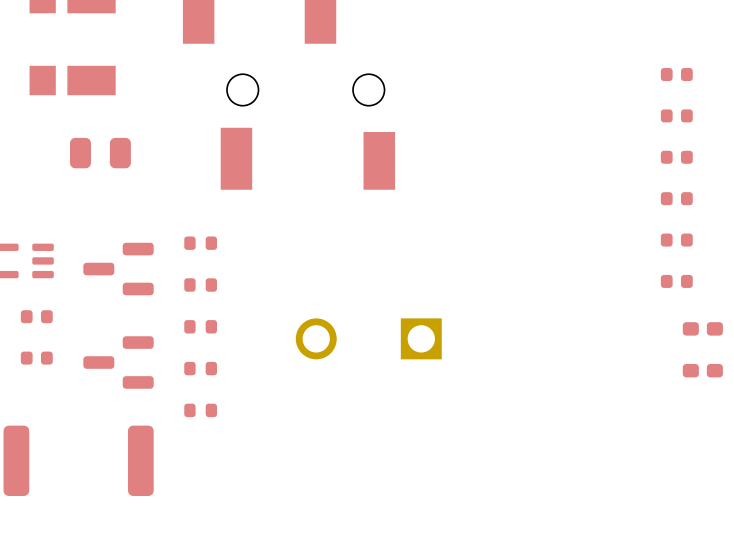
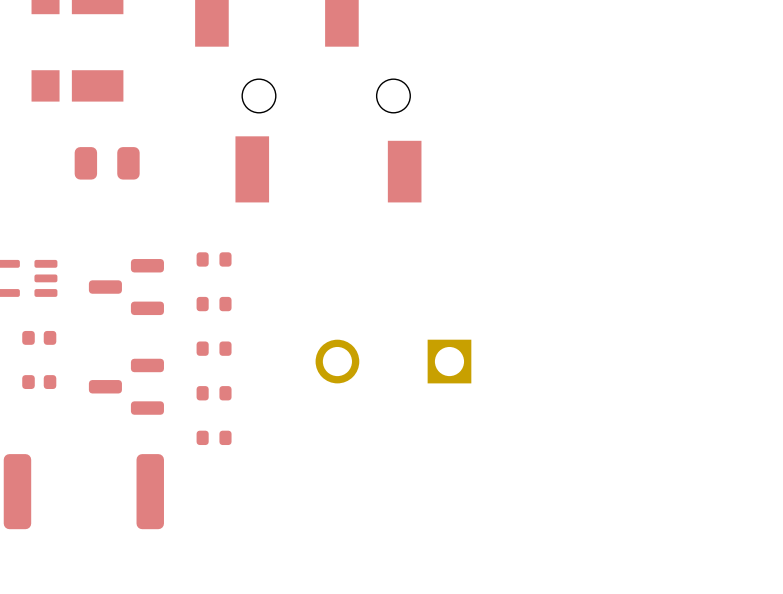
part: (676, 74) -> none
part: (676, 115) -> none
part: (676, 157) -> none
part: (676, 198) -> none
part: (676, 240) -> none
part: (676, 281) -> none
part: (702, 328) -> none
part: (702, 370) -> none

